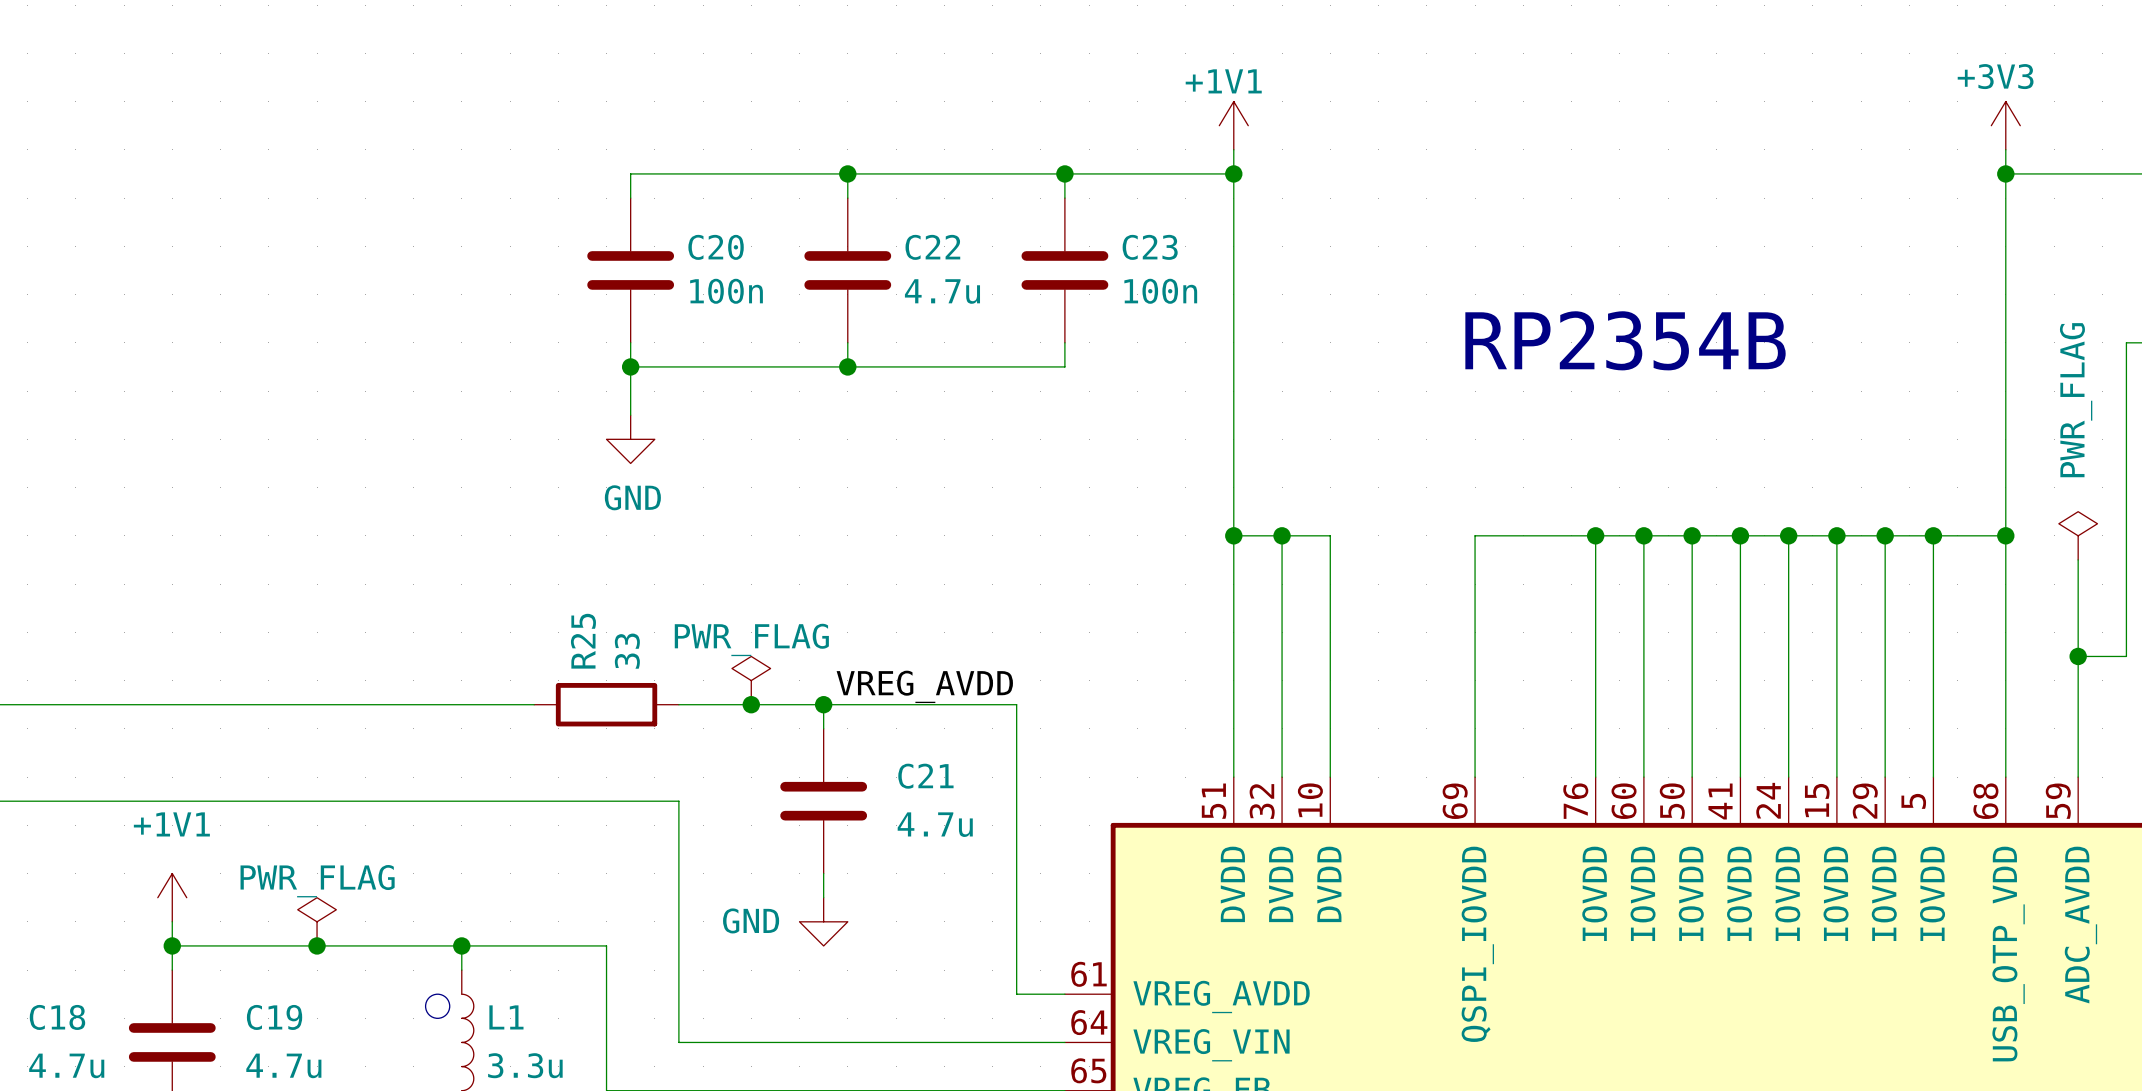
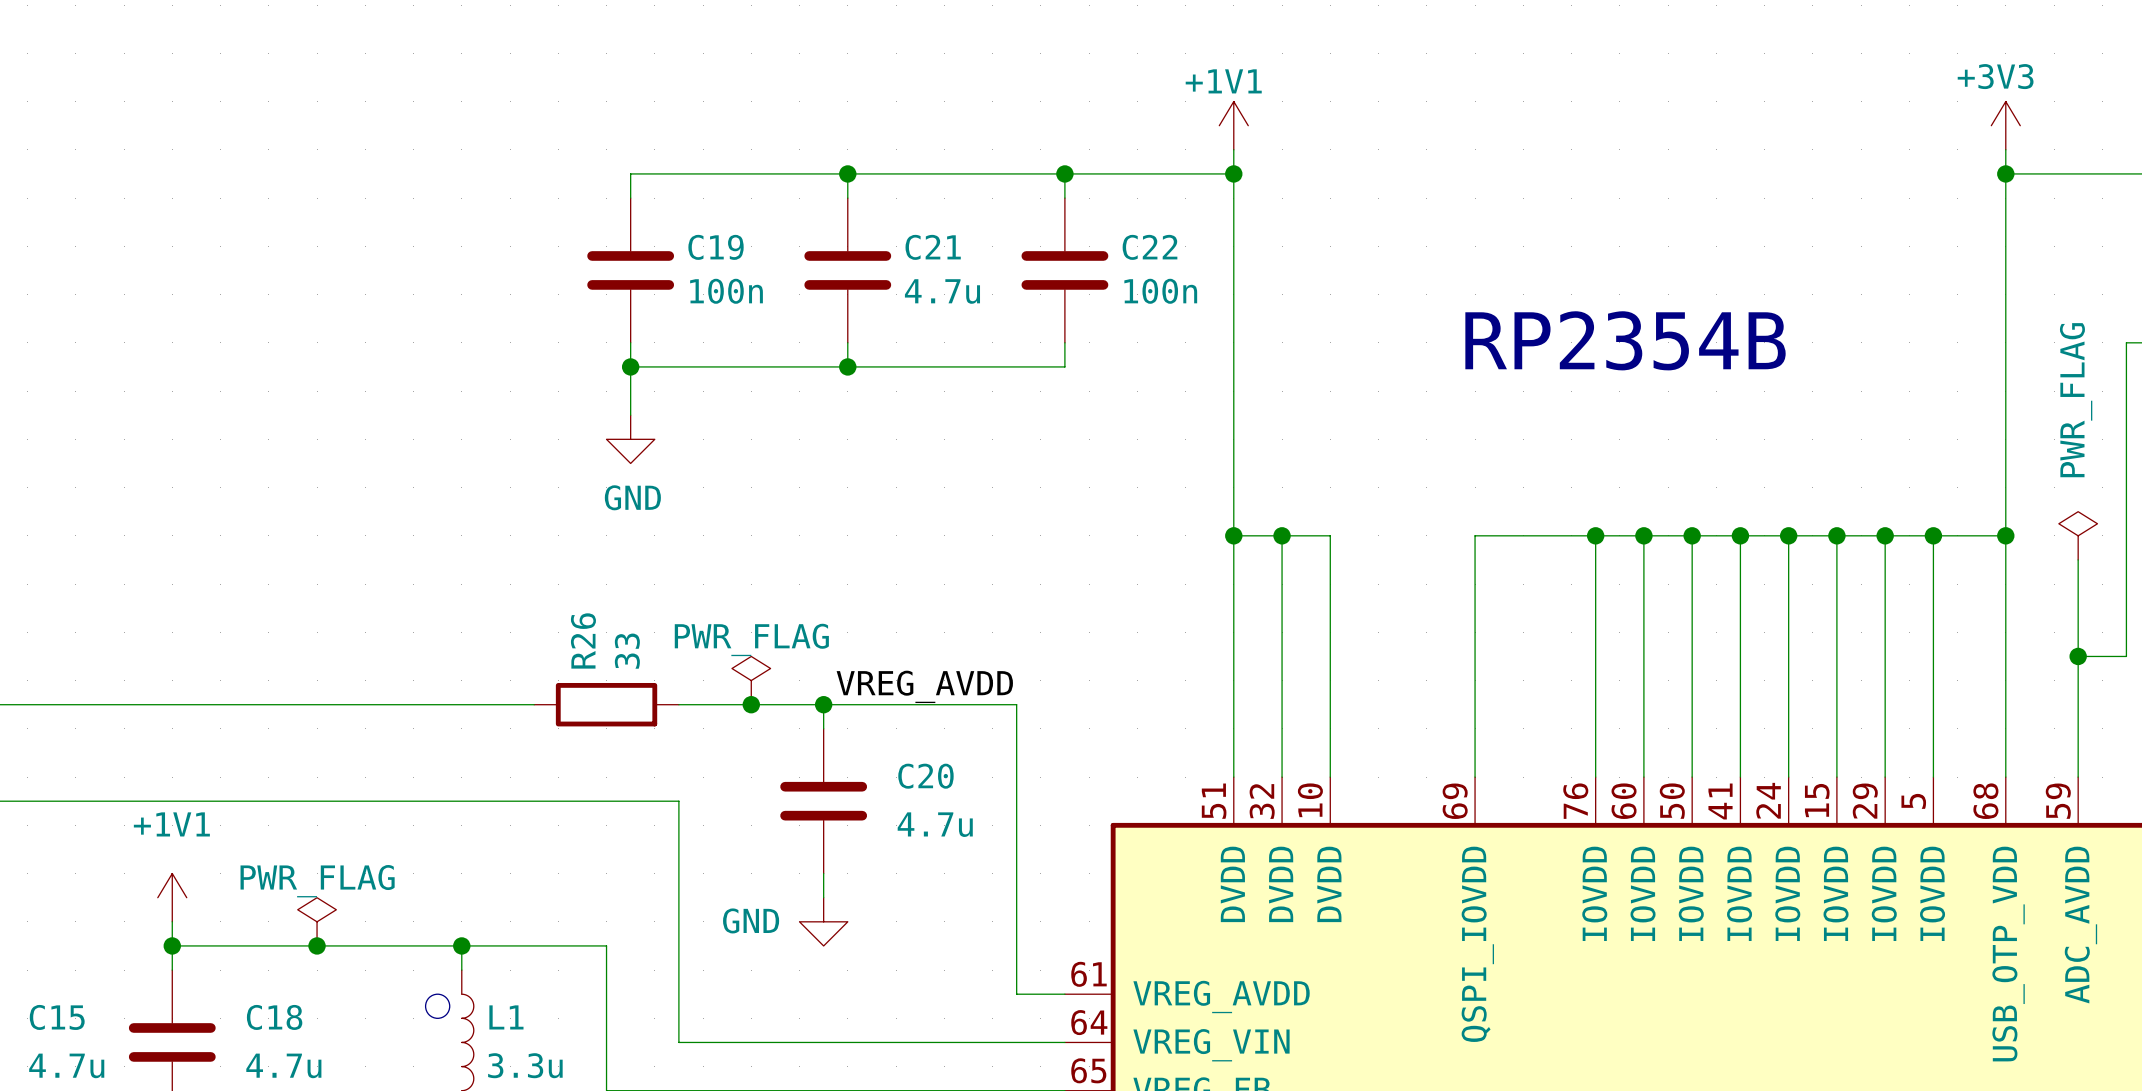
C20 name: C20 (716, 247) -> C19 (716, 247)
C22 name: C22 (932, 247) -> C21 (933, 247)
C23 name: C23 (1150, 247) -> C22 (1149, 247)
R25 name: R25 (583, 641) -> R26 (583, 640)
C21 name: C21 (925, 776) -> C20 (925, 776)
C18 name: C18 (57, 1017) -> C15 (57, 1017)
C19 name: C19 (274, 1017) -> C18 (274, 1017)

